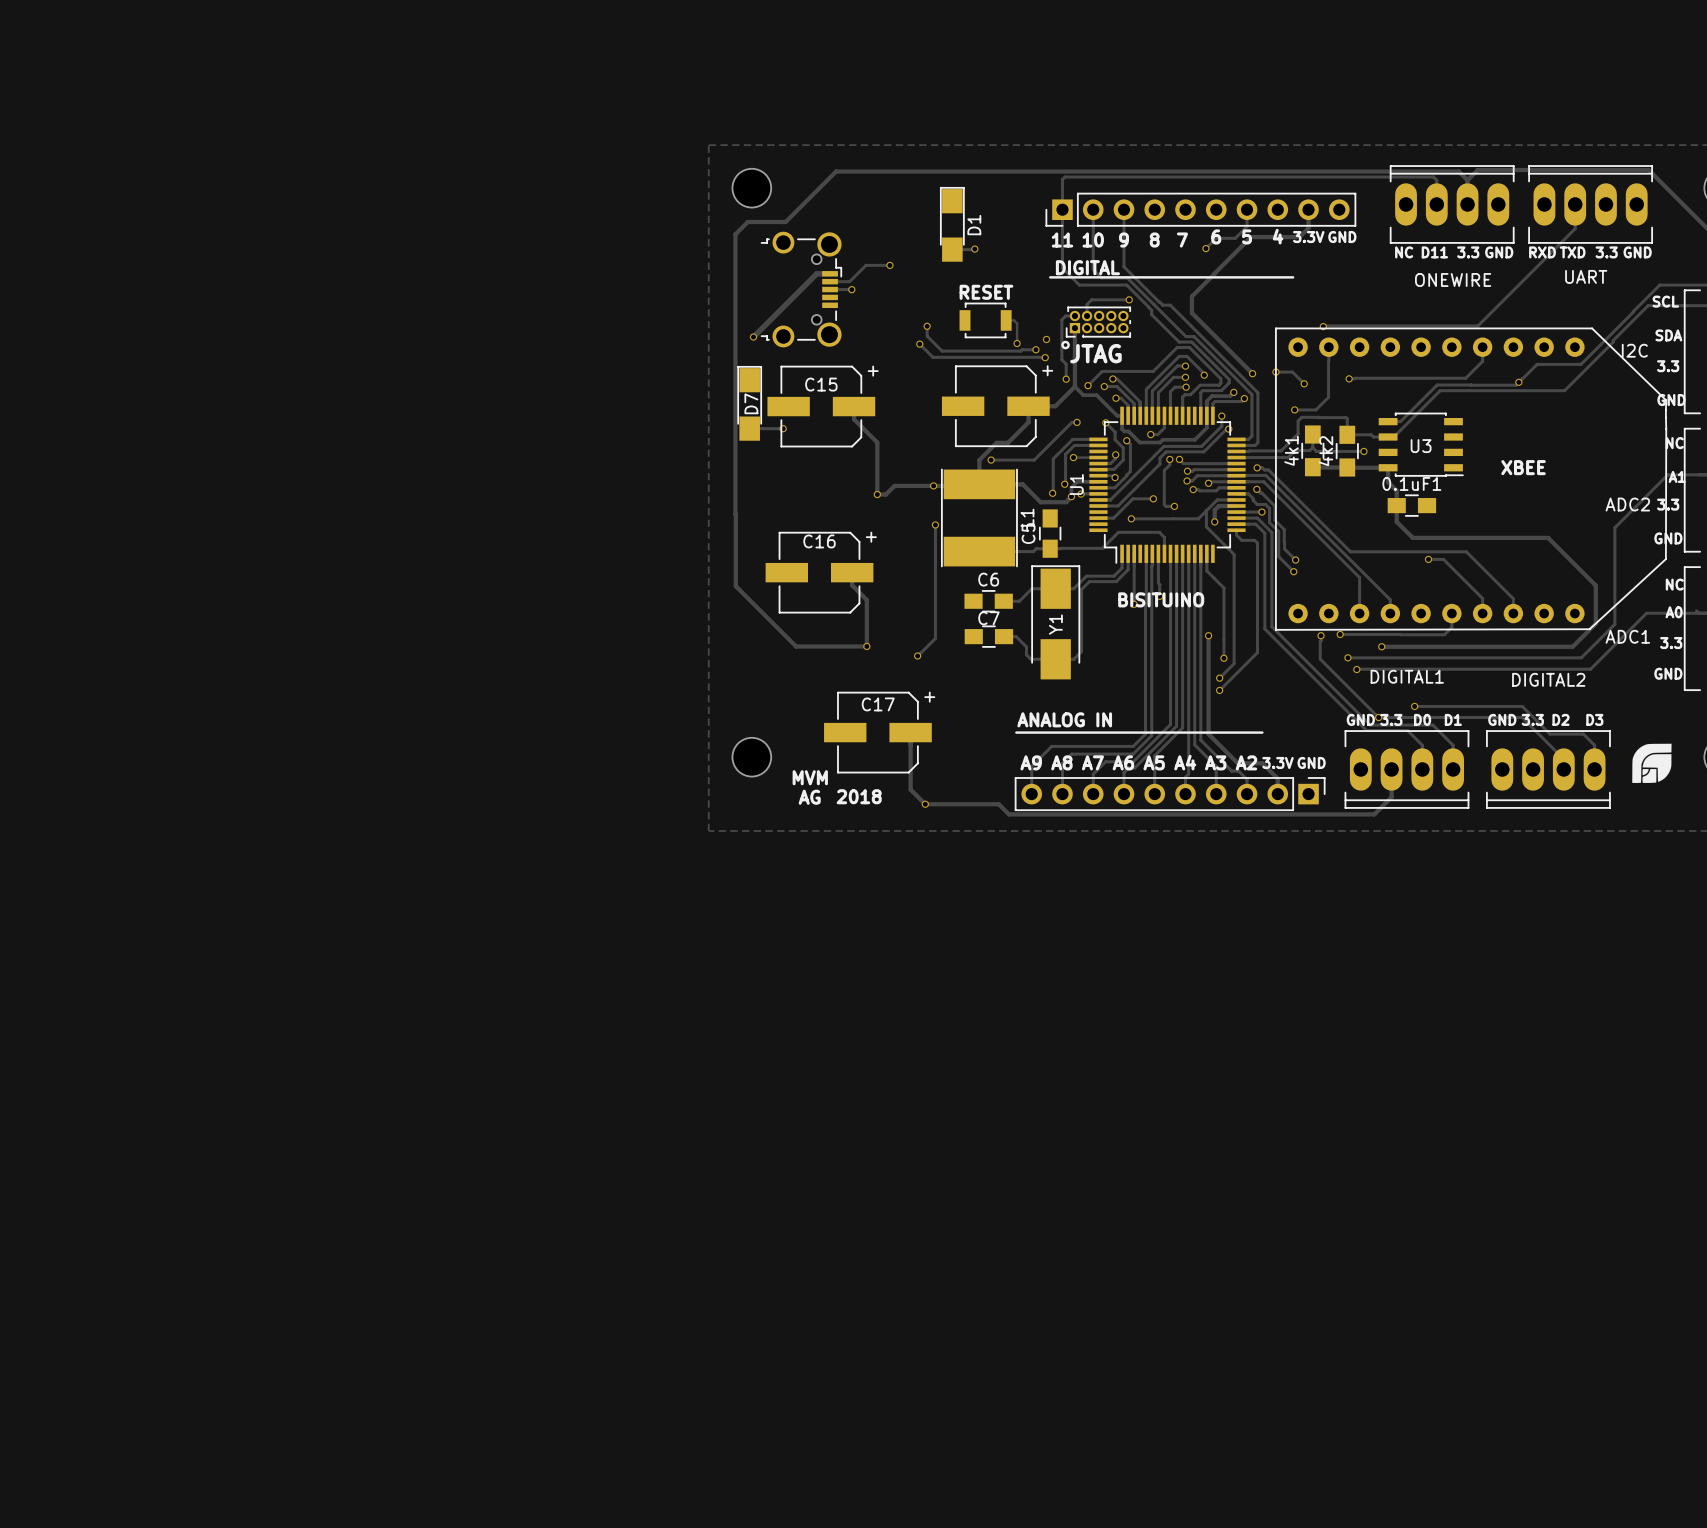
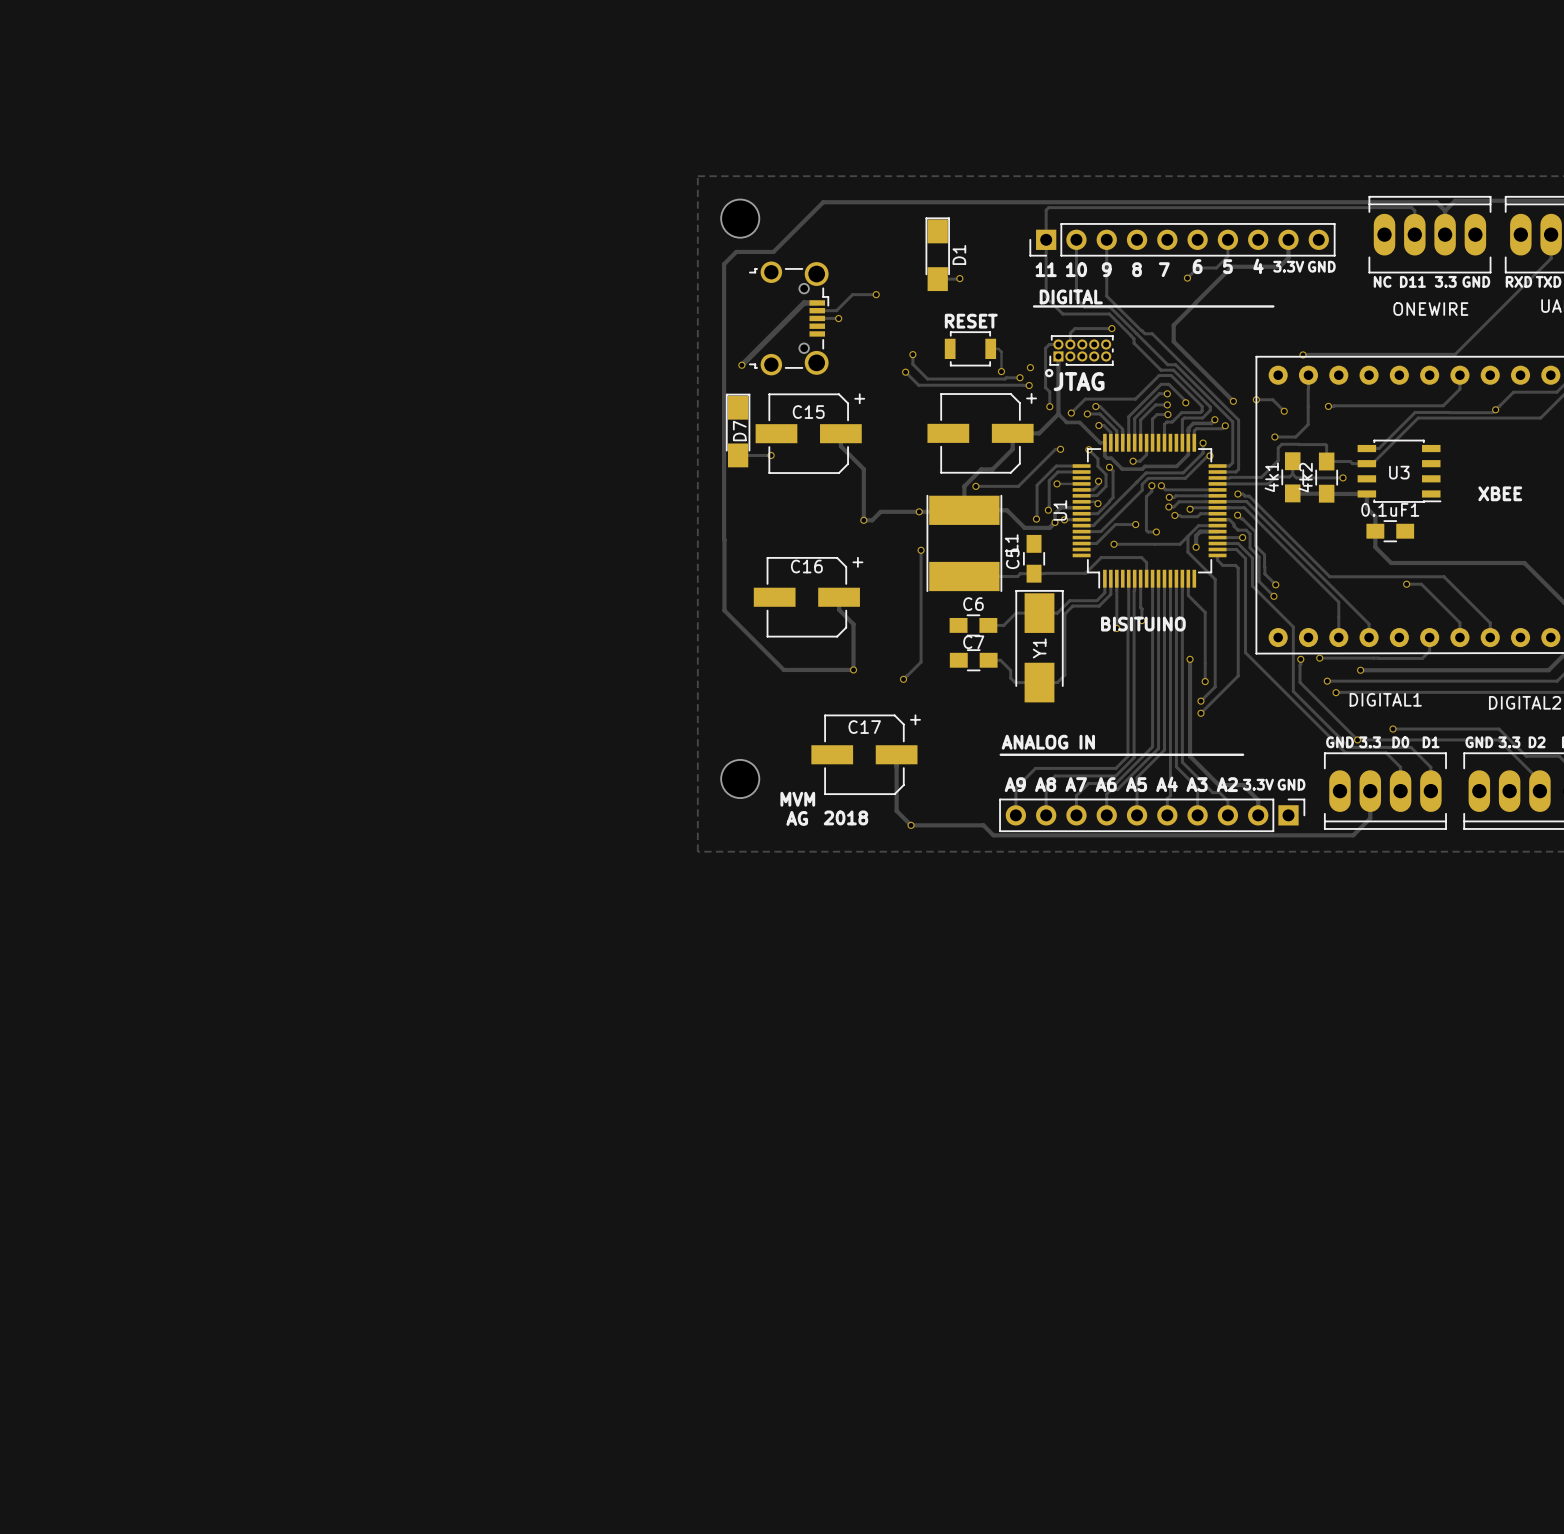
track: (1271, 561) (1271, 626) (1313, 668) -> (1252, 586) (1293, 626) (1293, 691)

